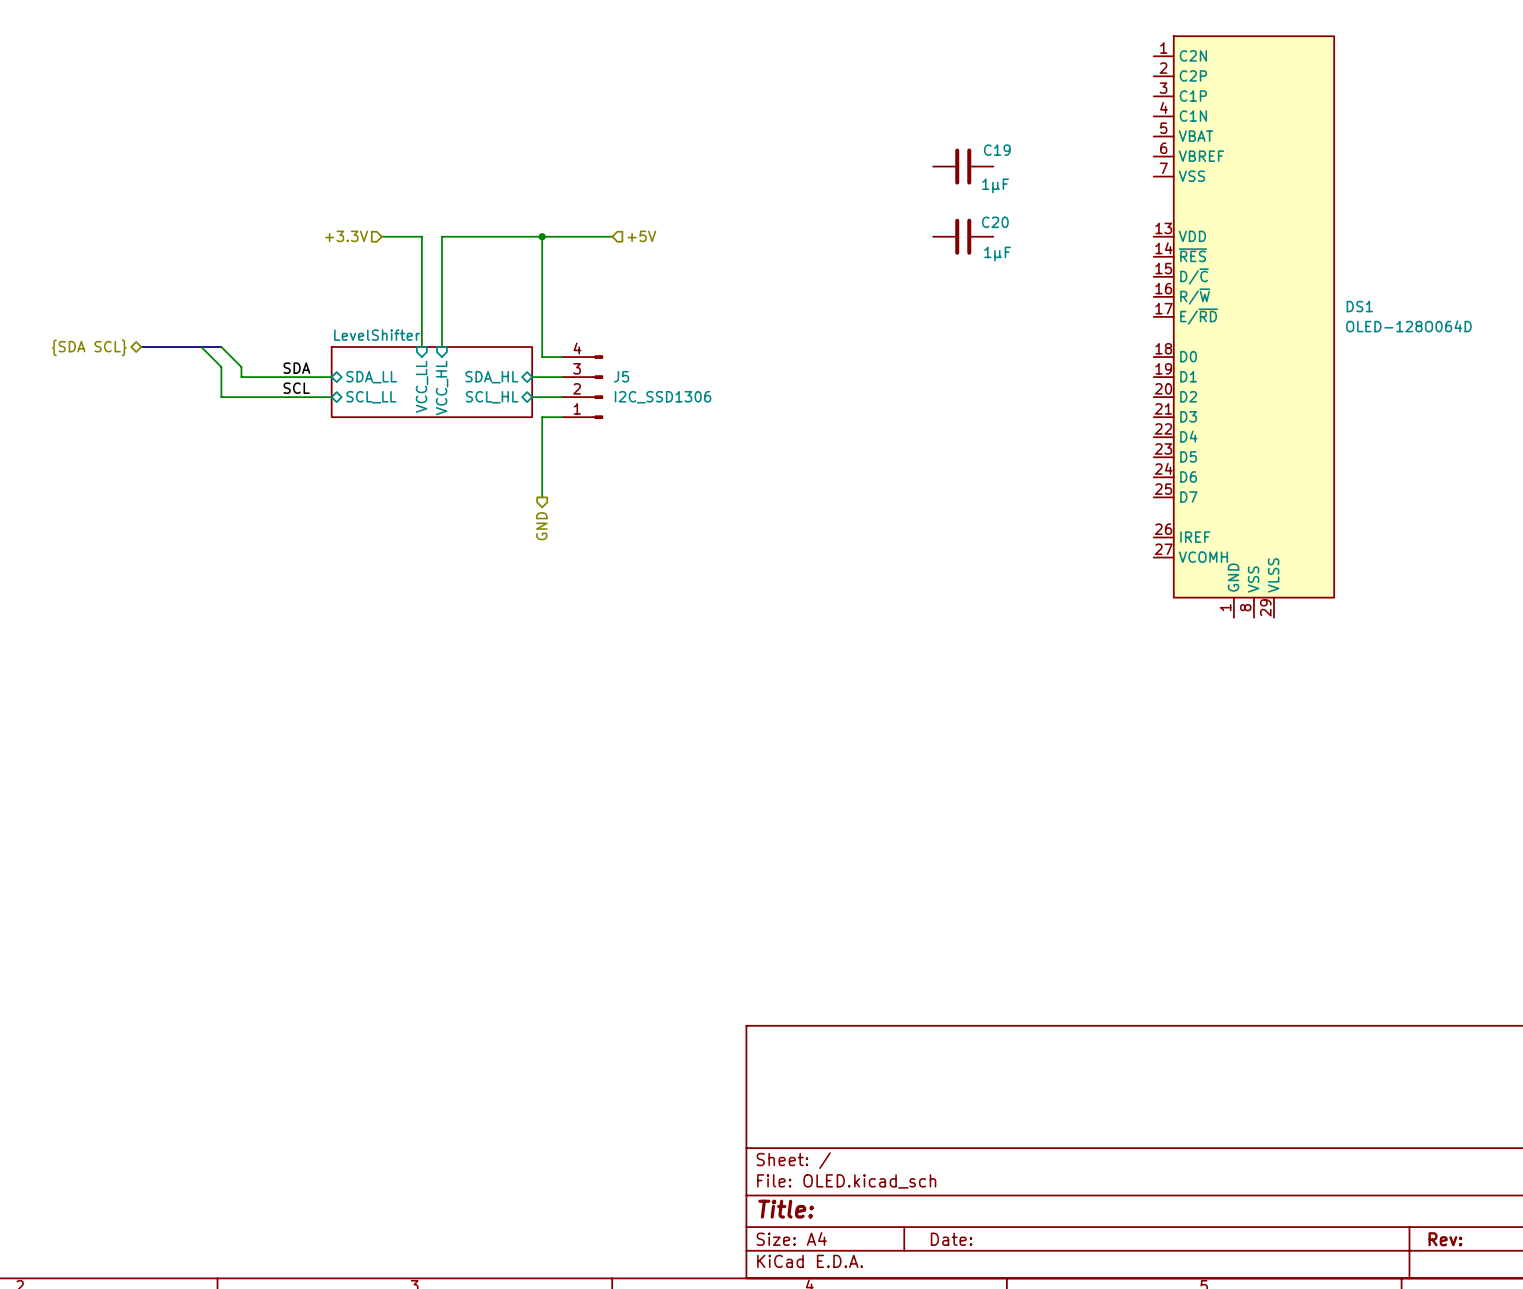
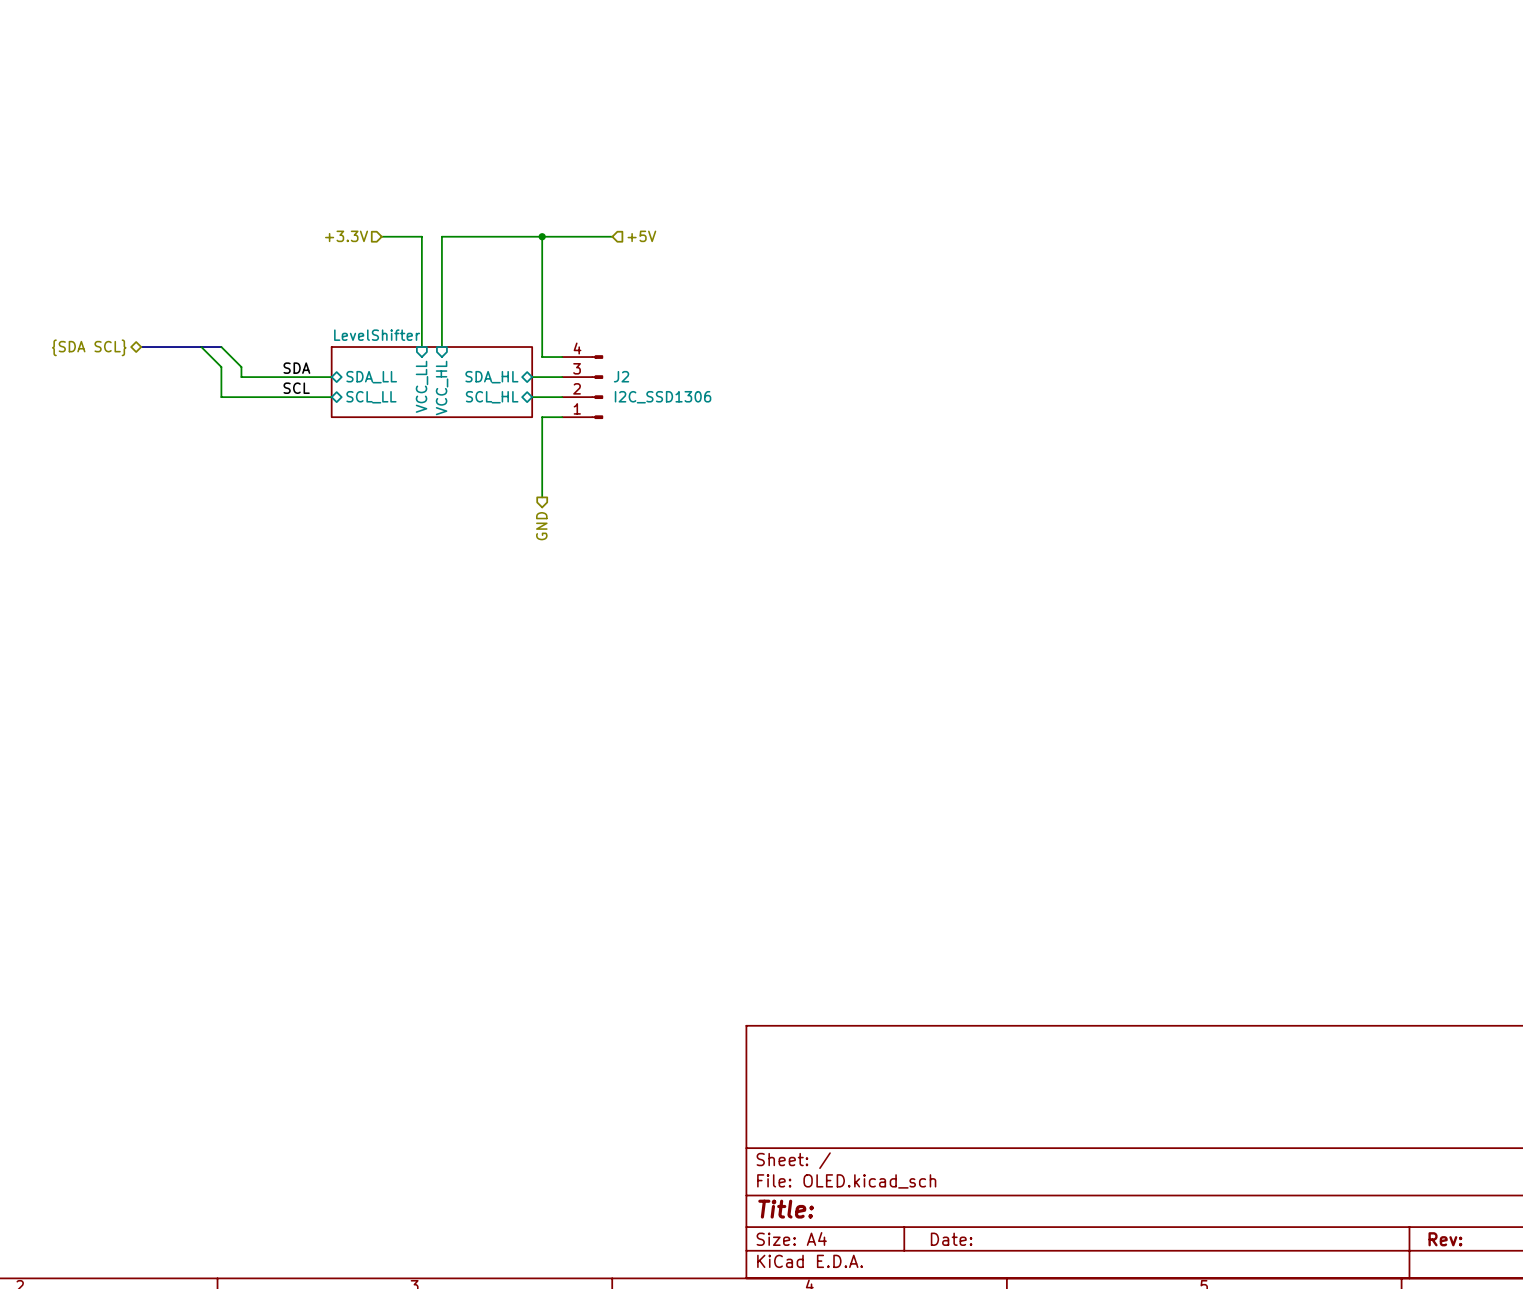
C19: 1µF (963, 166) -> none
C20: 1µF (963, 236) -> none
DS1: OLED-128O064D (1243, 326) -> none
J5 name: J5 (621, 376) -> J2 (621, 376)

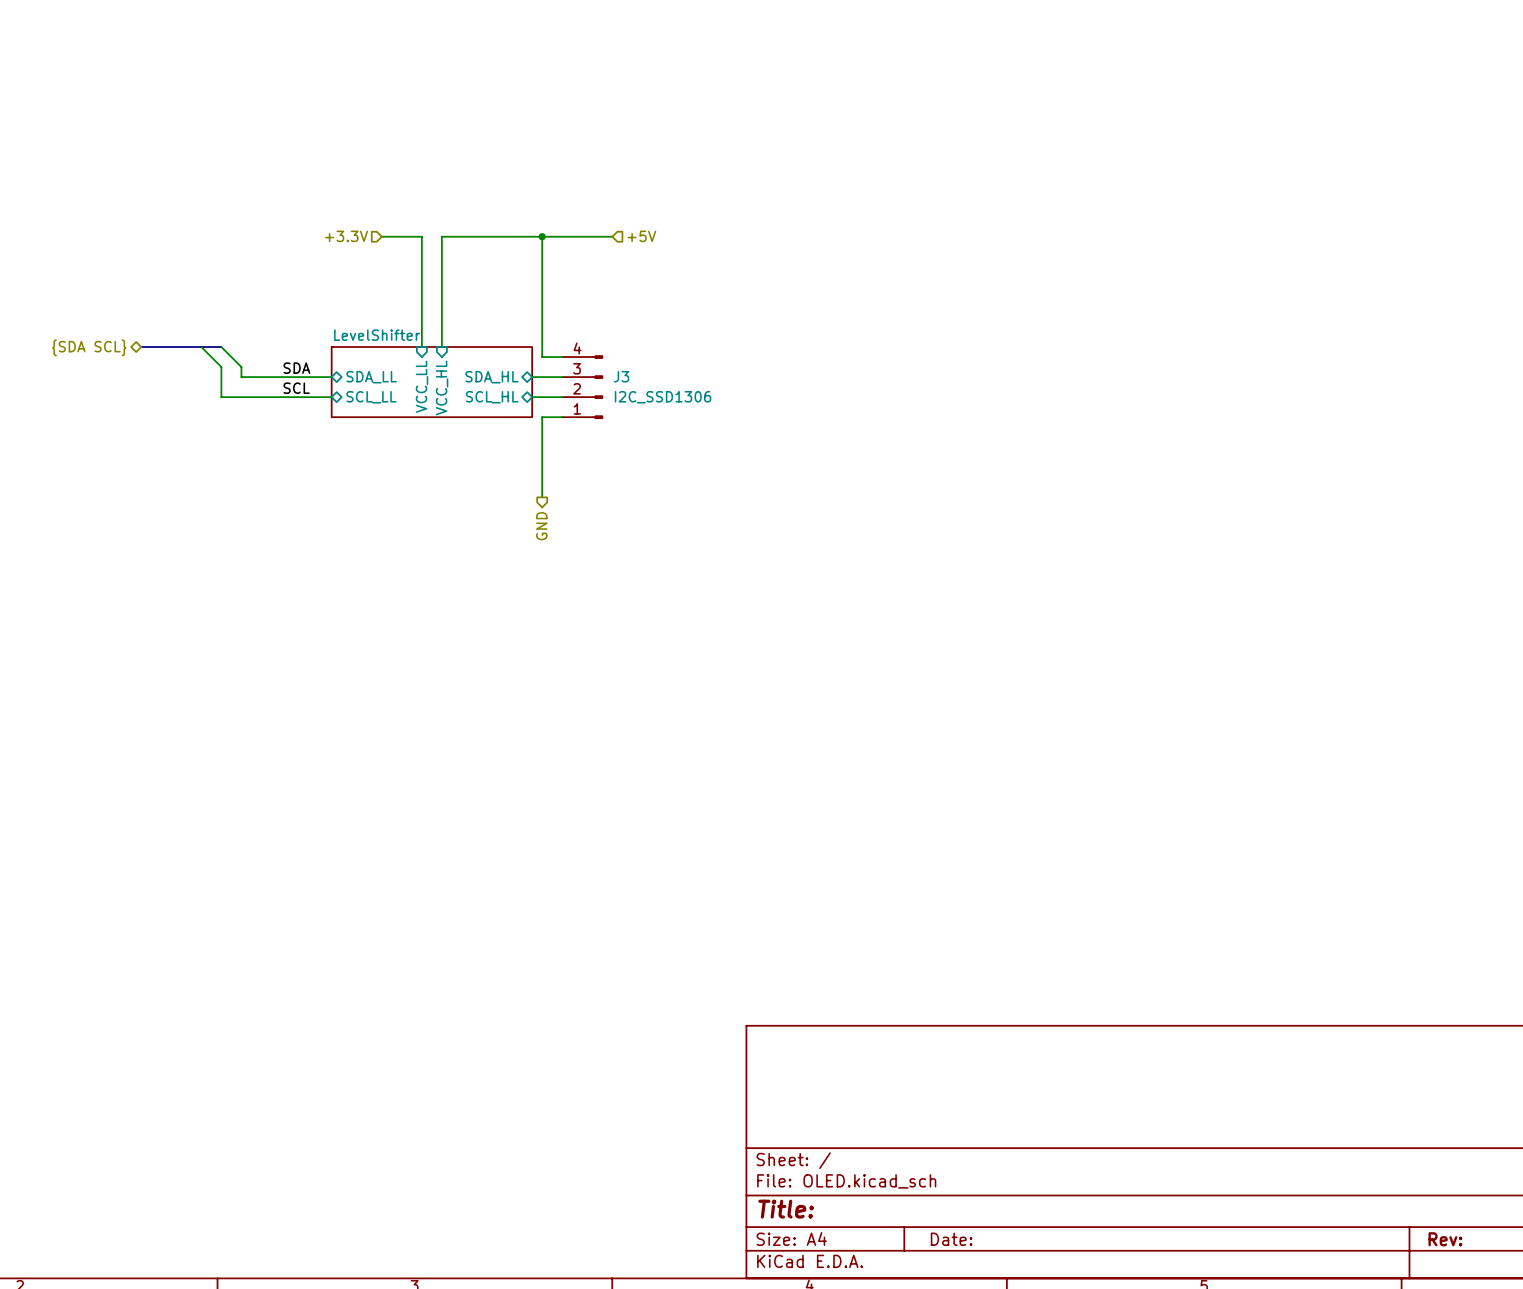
J2 name: J2 (621, 376) -> J3 (621, 376)

